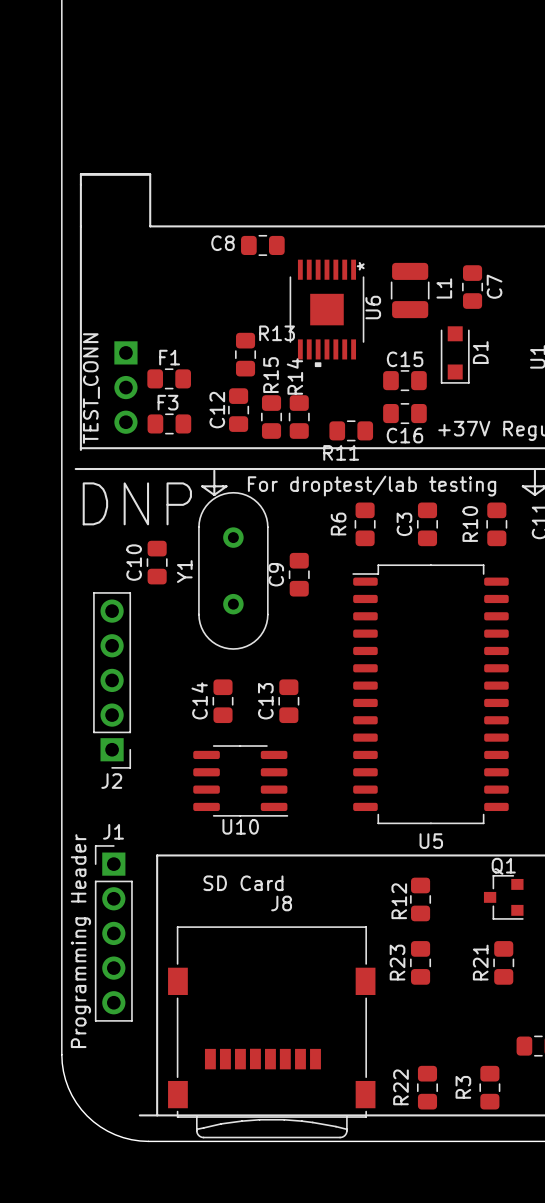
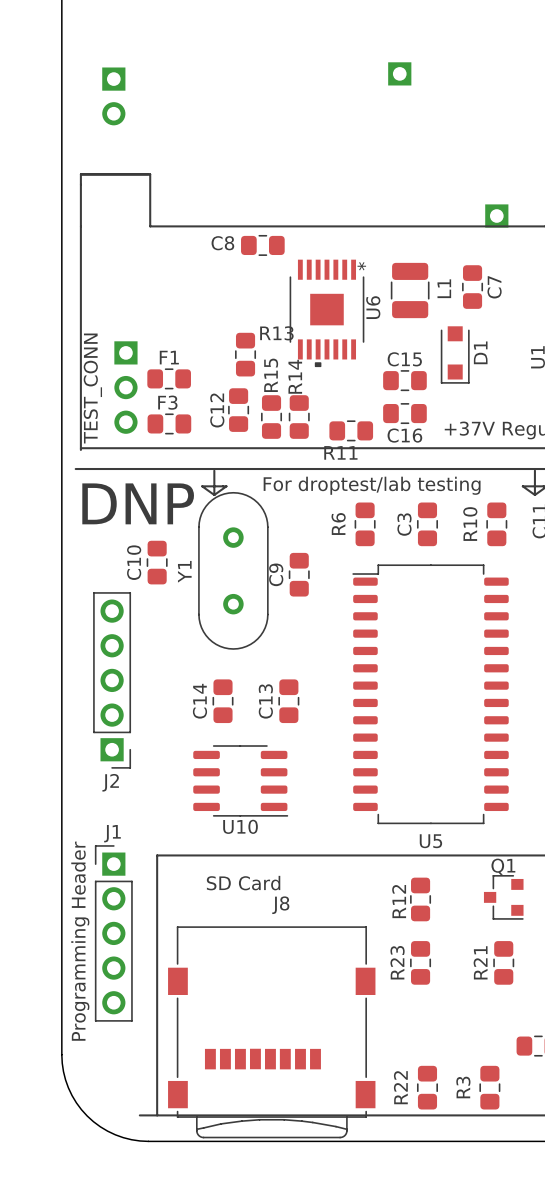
part: none -> (399, 73)
part: none -> (113, 96)
part: none -> (496, 215)

